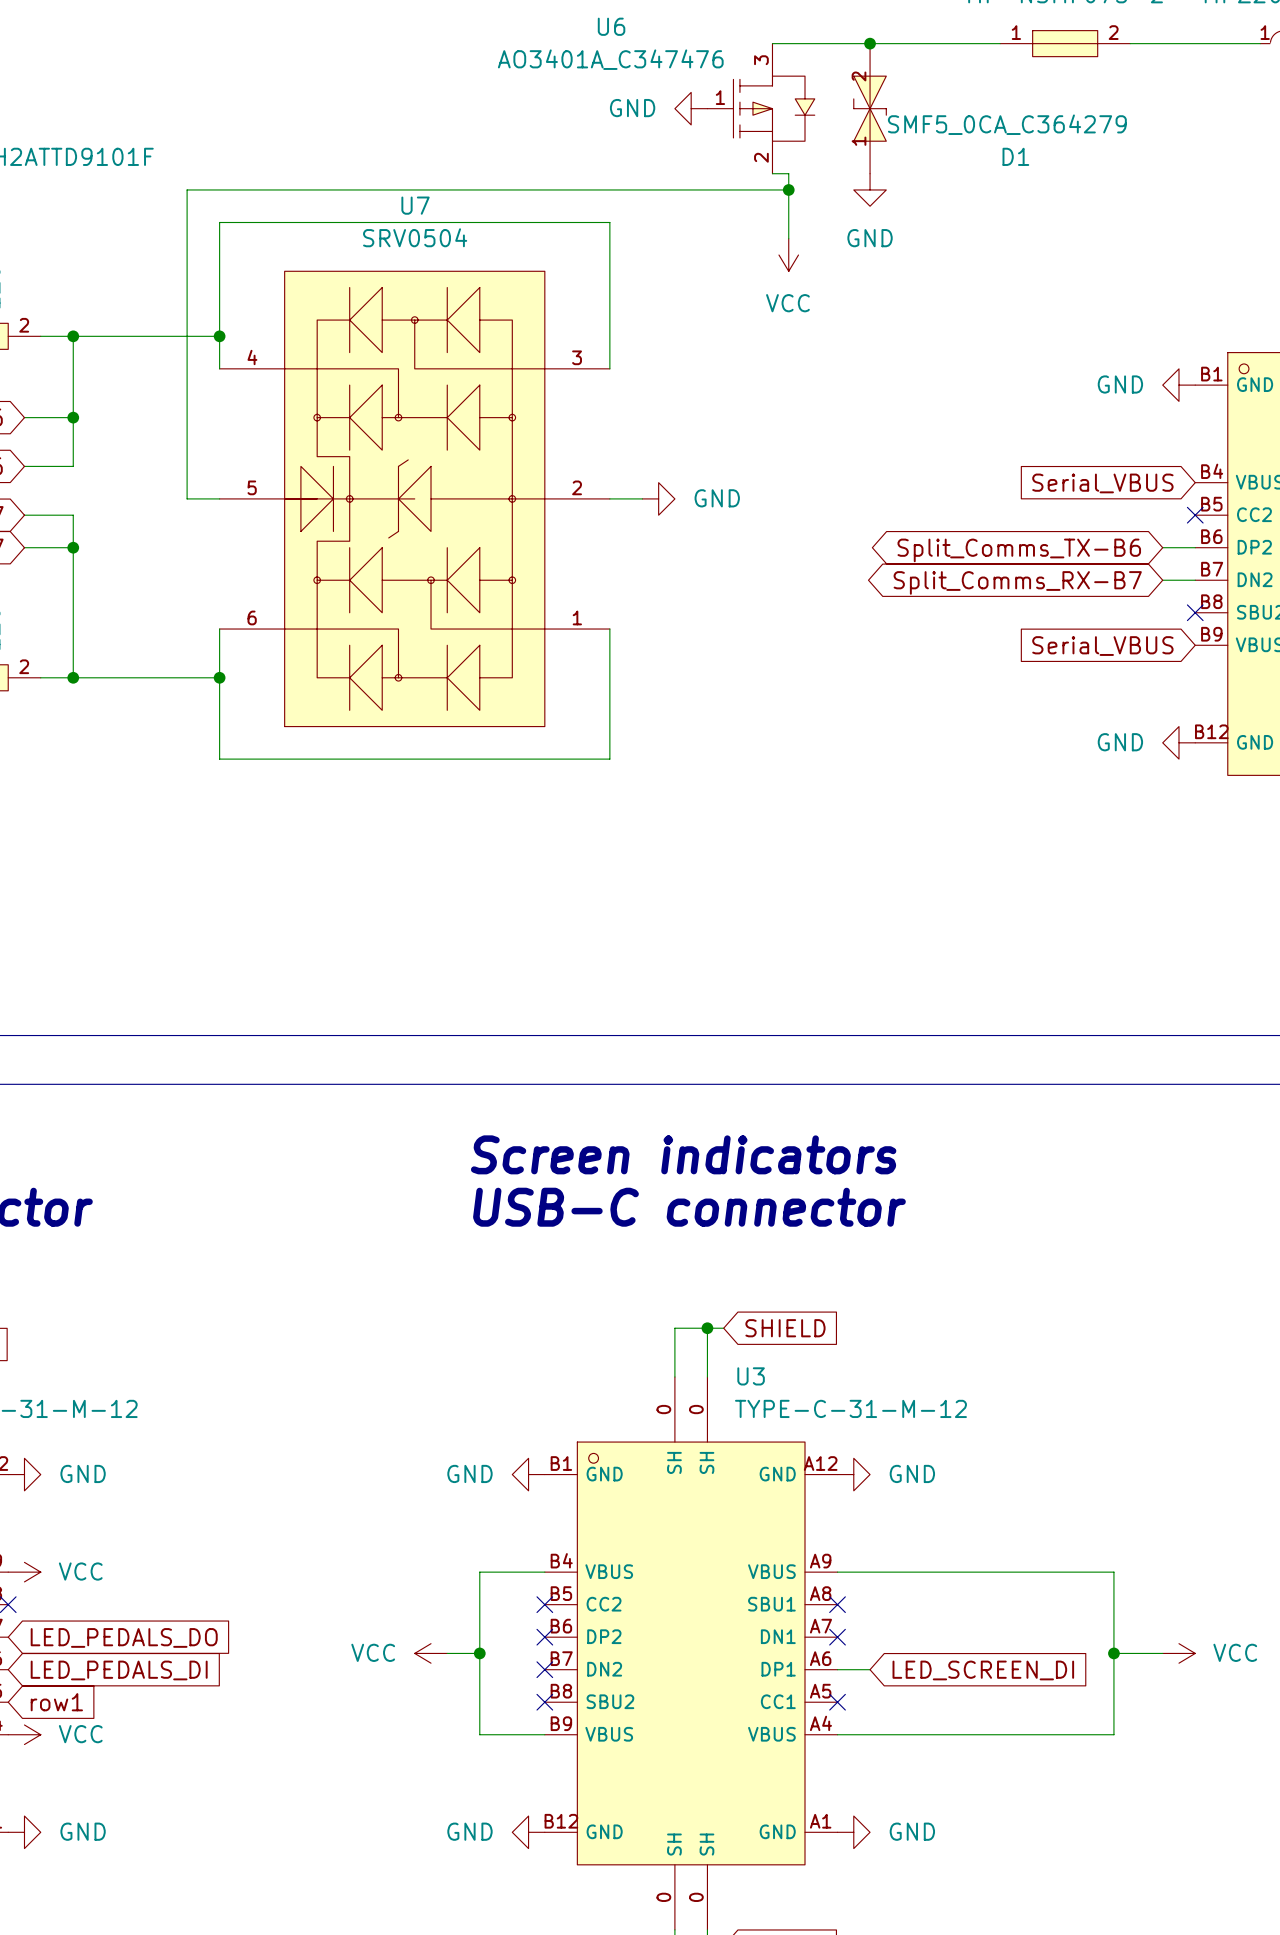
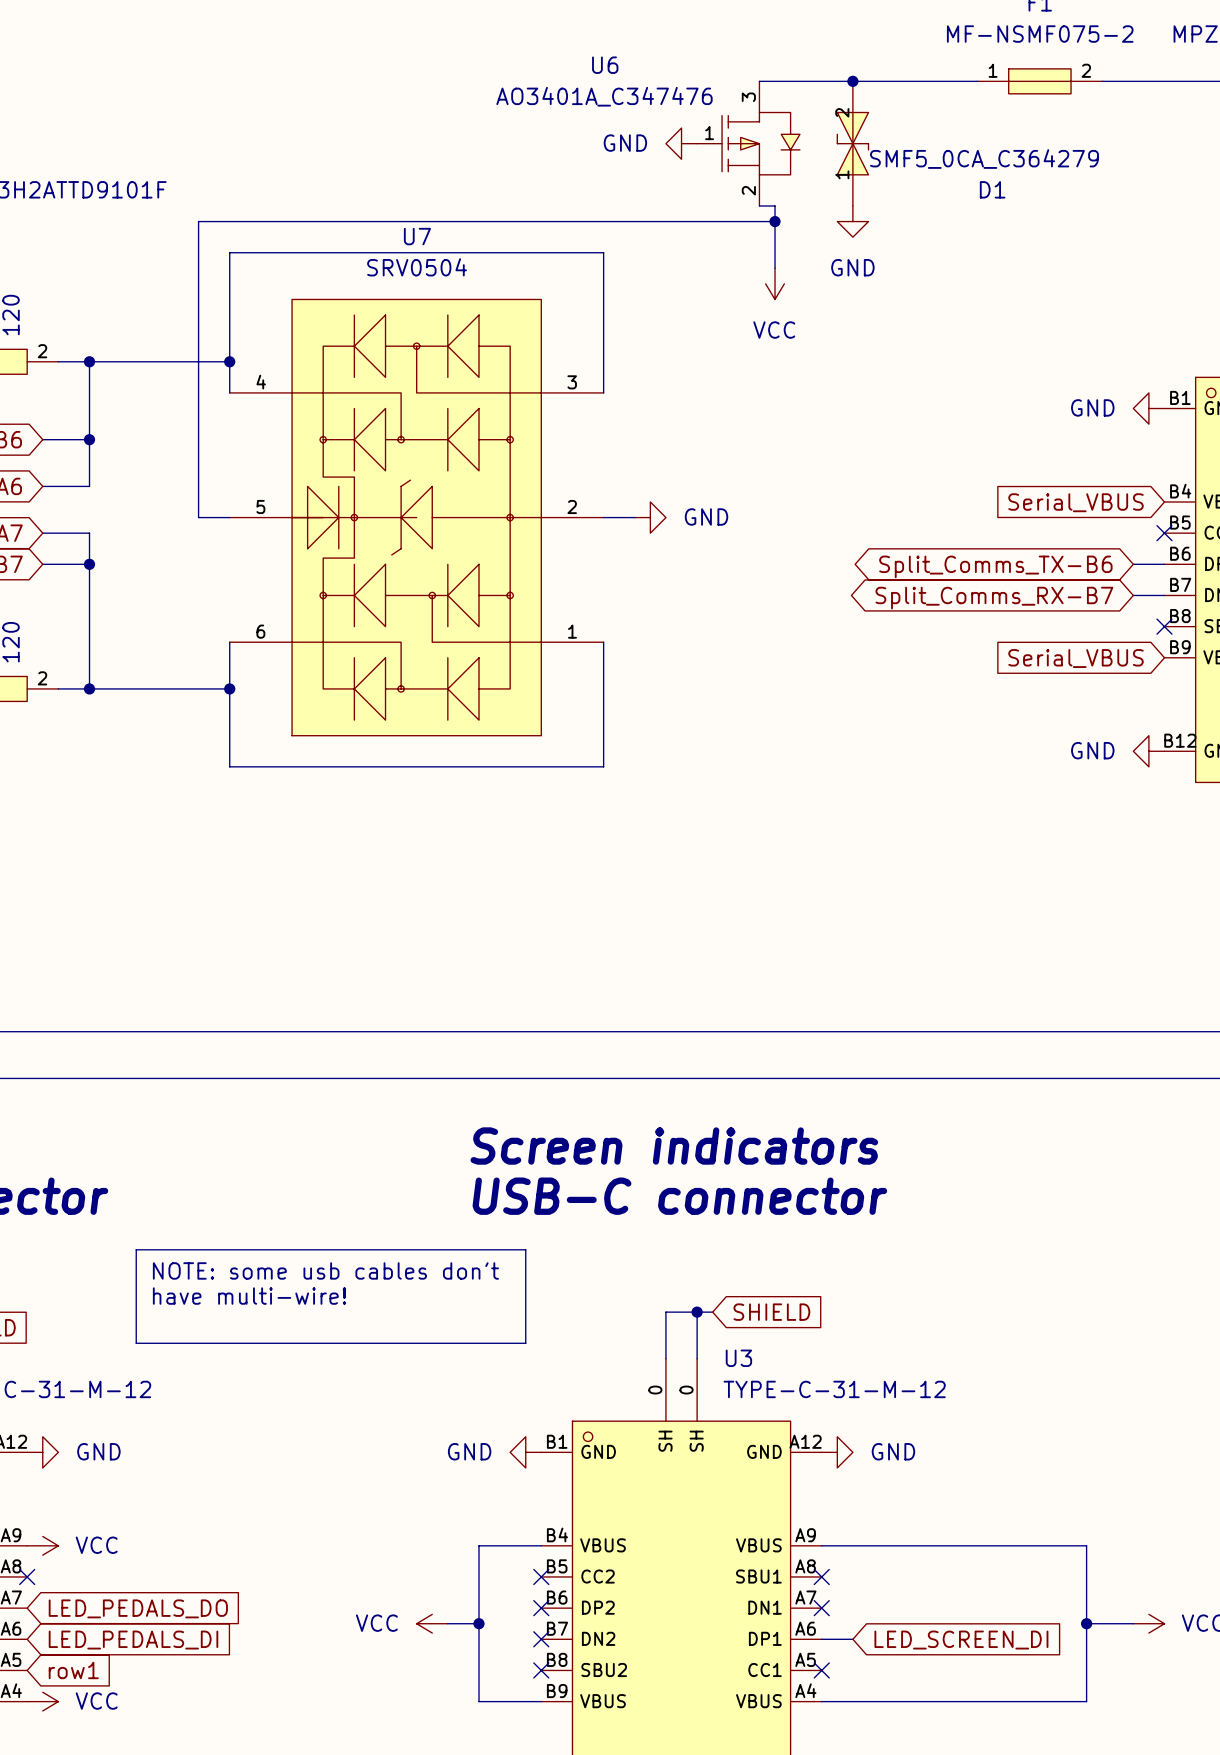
line: none -> (136, 1249) (525, 1249) (525, 1343) (136, 1343) (136, 1249)
text: none -> NOTE: some usb cables don't (325, 1270)
text: none -> have multi-wire! (249, 1296)

